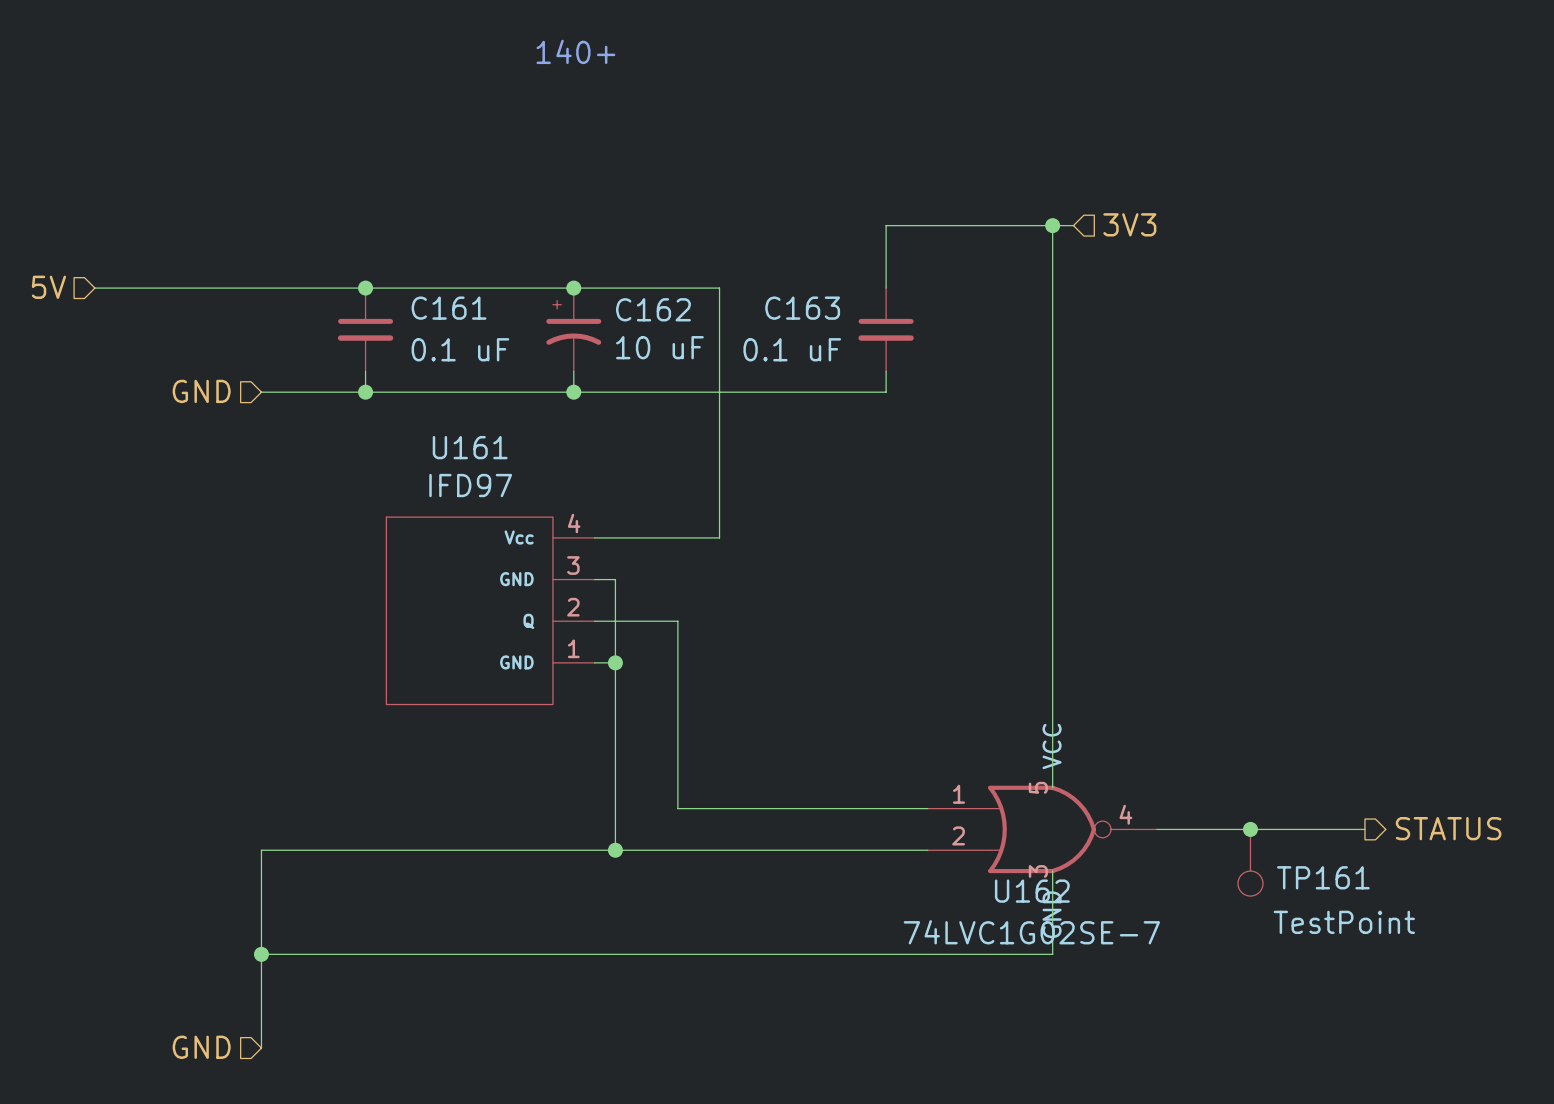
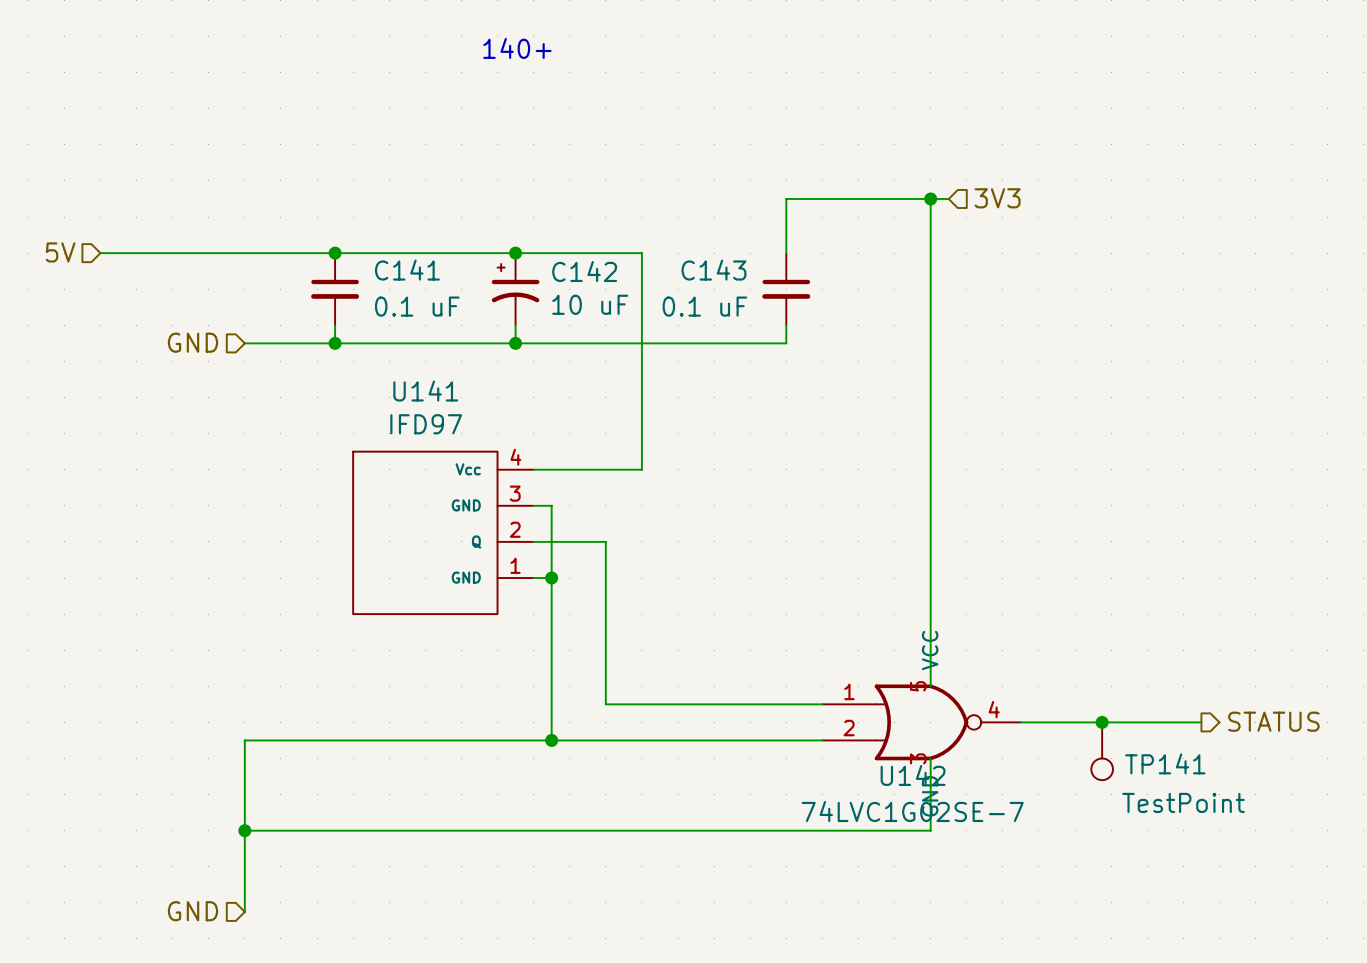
C161 name: C161 (449, 308) -> C141 (407, 270)
C163 name: C163 (802, 308) -> C143 (713, 270)
C162 name: C162 (653, 309) -> C142 (584, 271)
U161 name: U161 (470, 447) -> U141 (425, 391)
TP161 name: TP161 (1323, 877) -> TP141 (1165, 763)
U162 name: U162 (1032, 891) -> U142 (913, 775)

